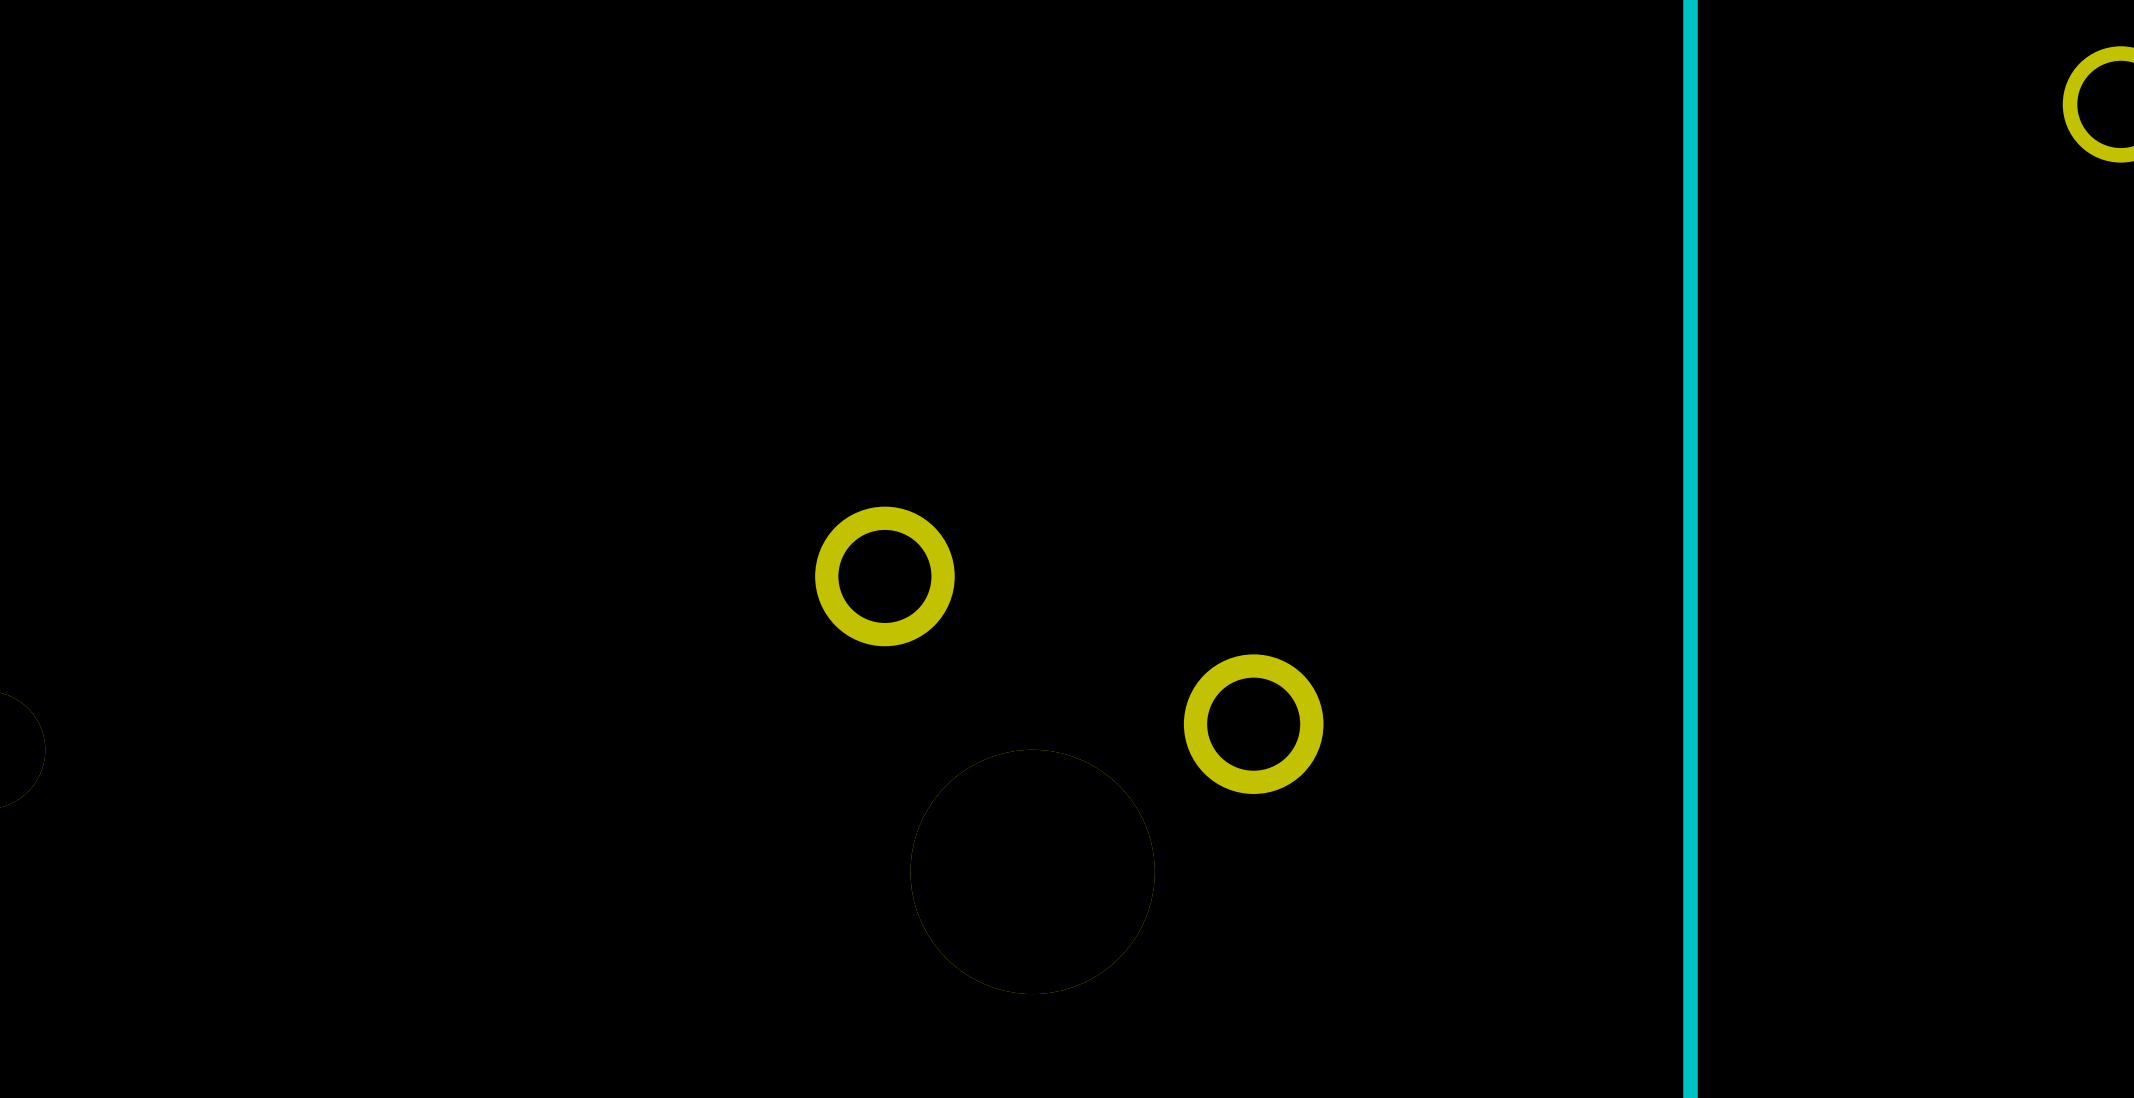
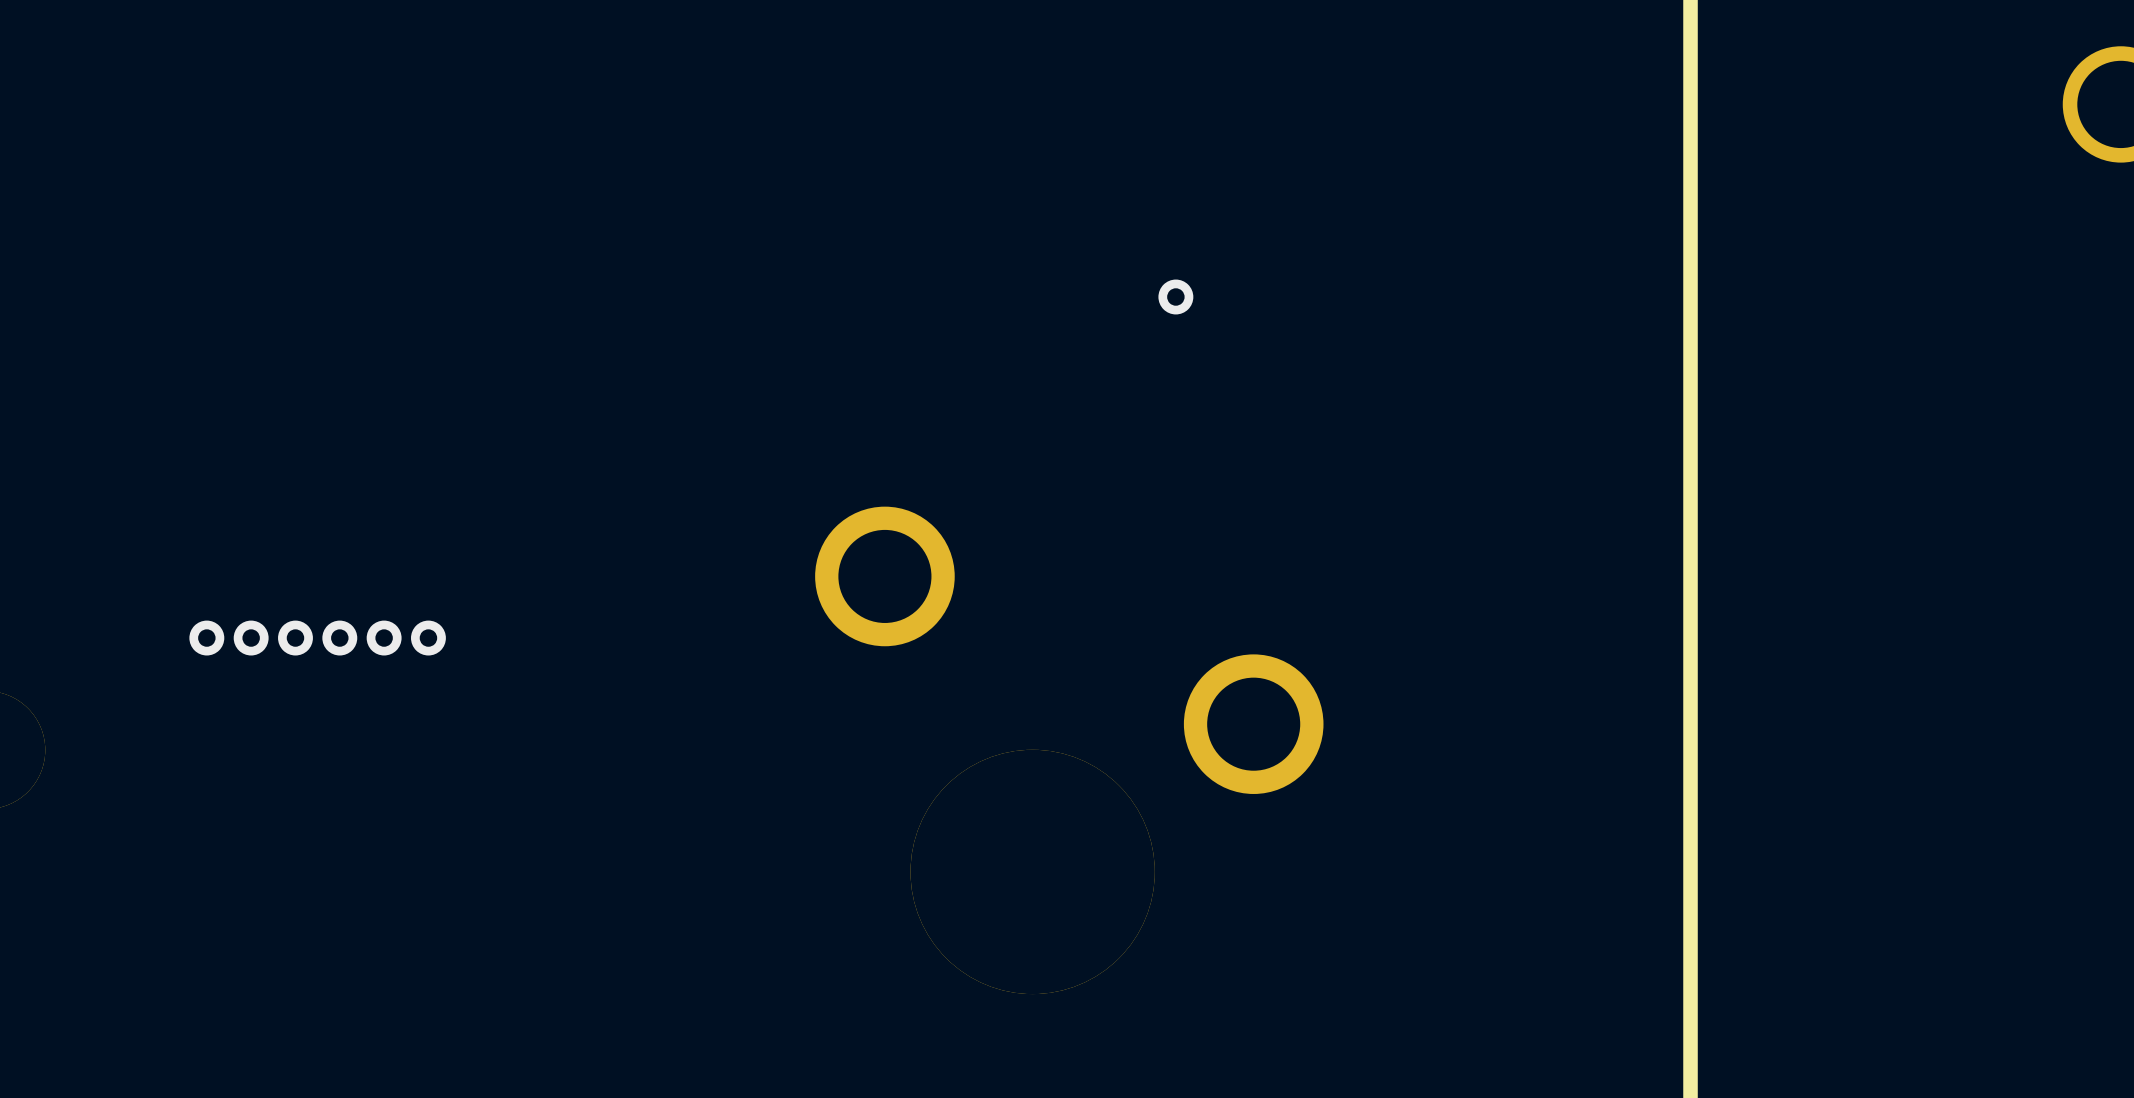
via: none -> (1175, 297)
via: none -> (206, 638)
via: none -> (251, 638)
via: none -> (295, 638)
via: none -> (339, 638)
via: none -> (384, 638)
via: none -> (428, 638)

